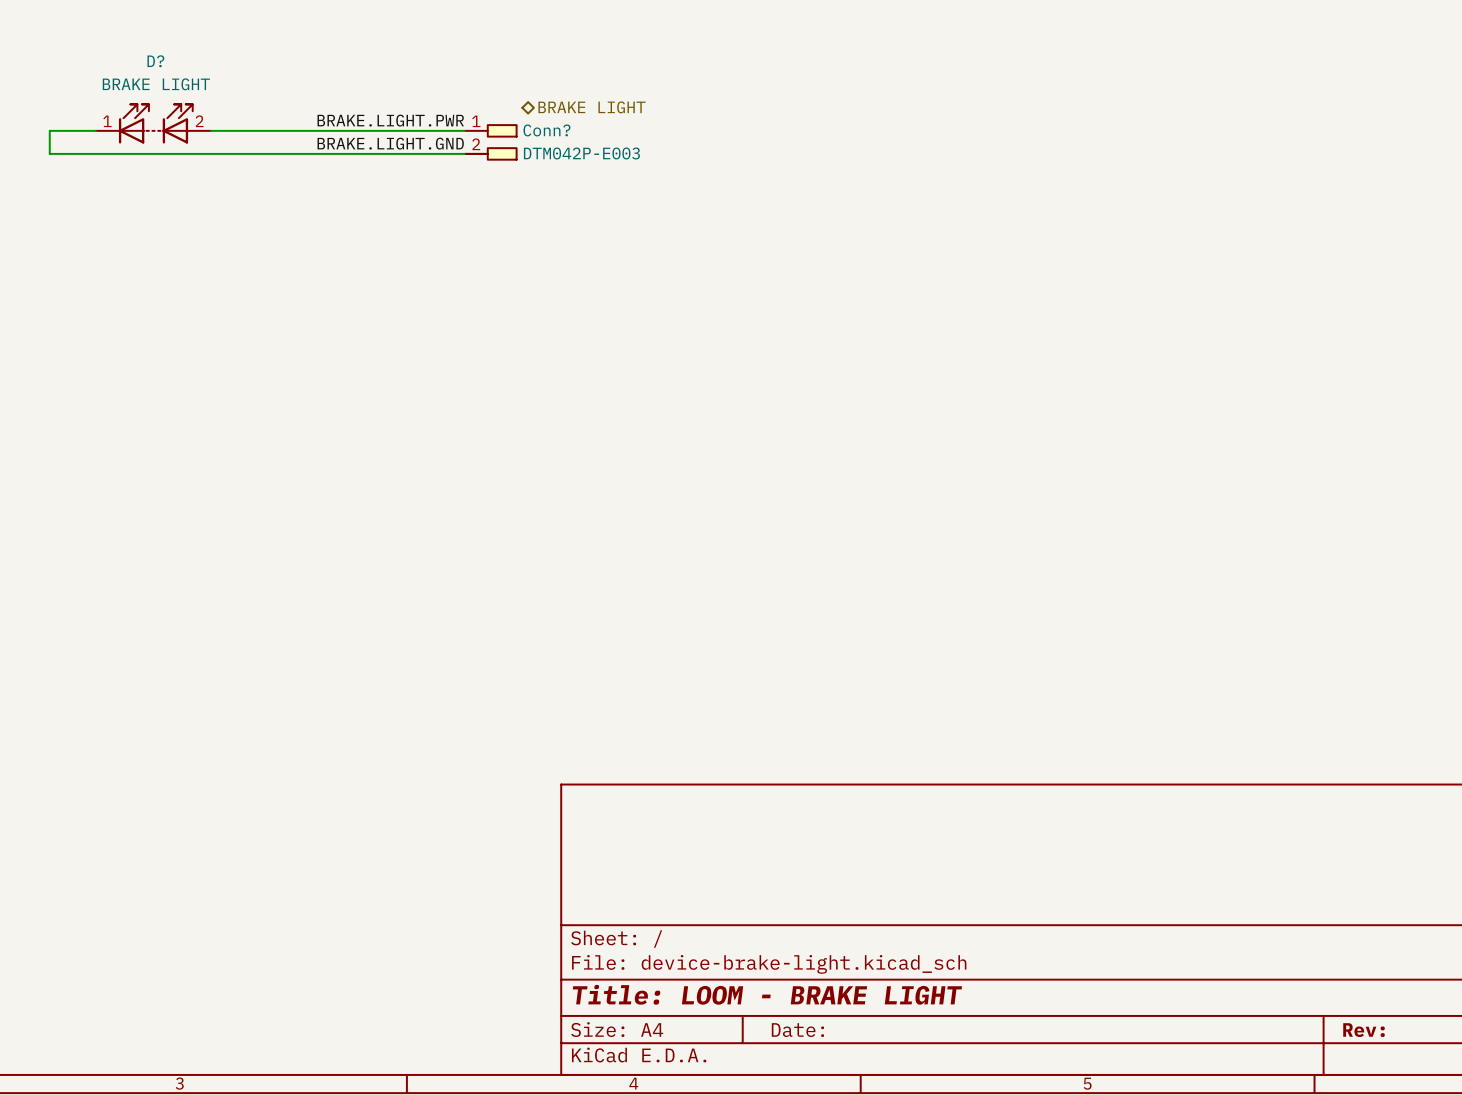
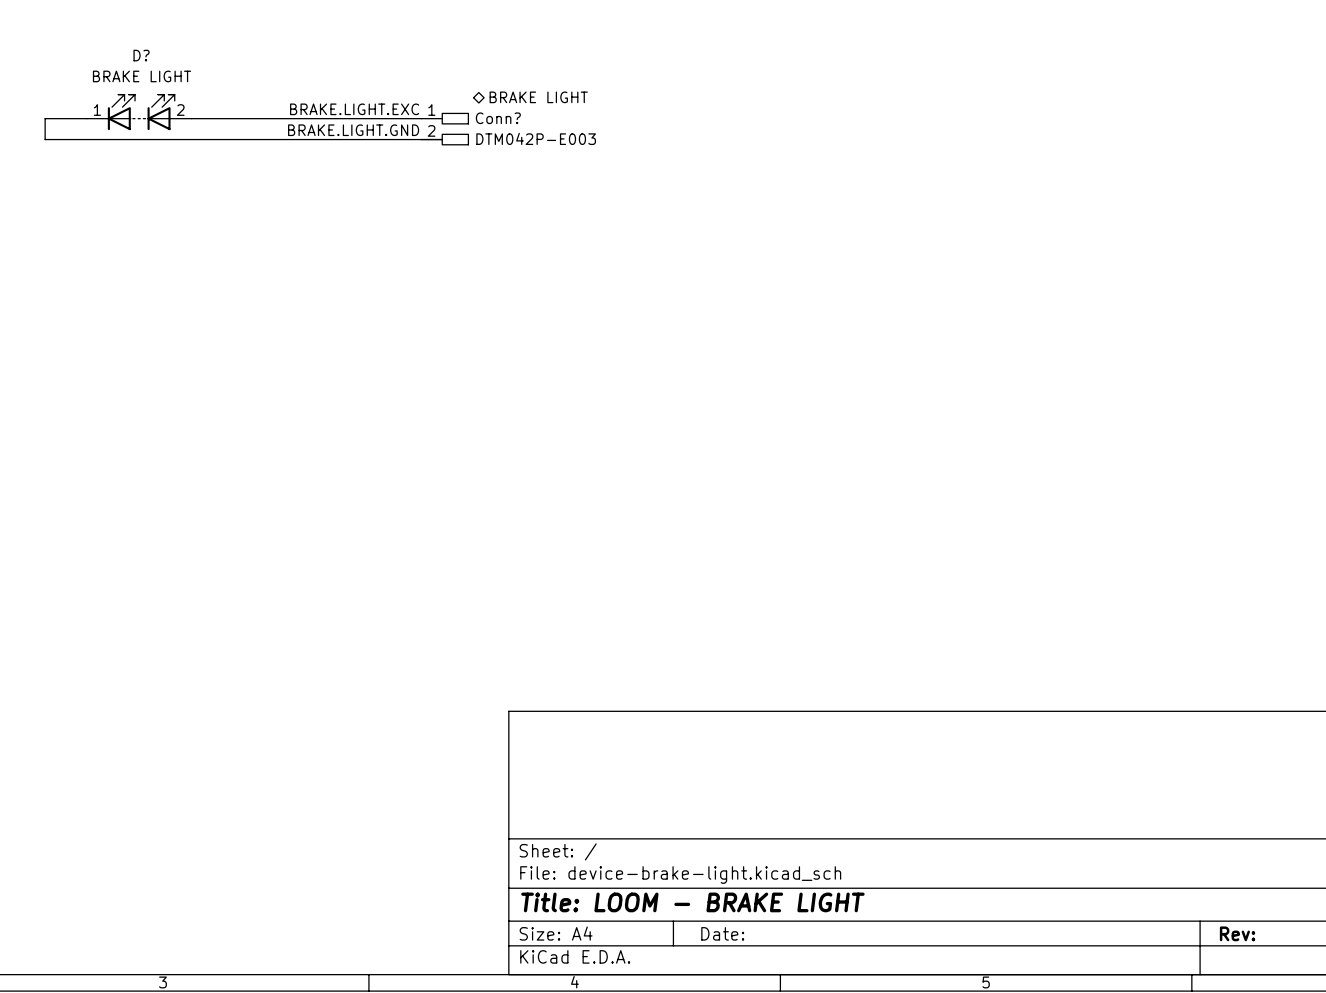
label: BRAKE.LIGHT.PWR (390, 120) -> BRAKE.LIGHT.EXC (354, 109)

